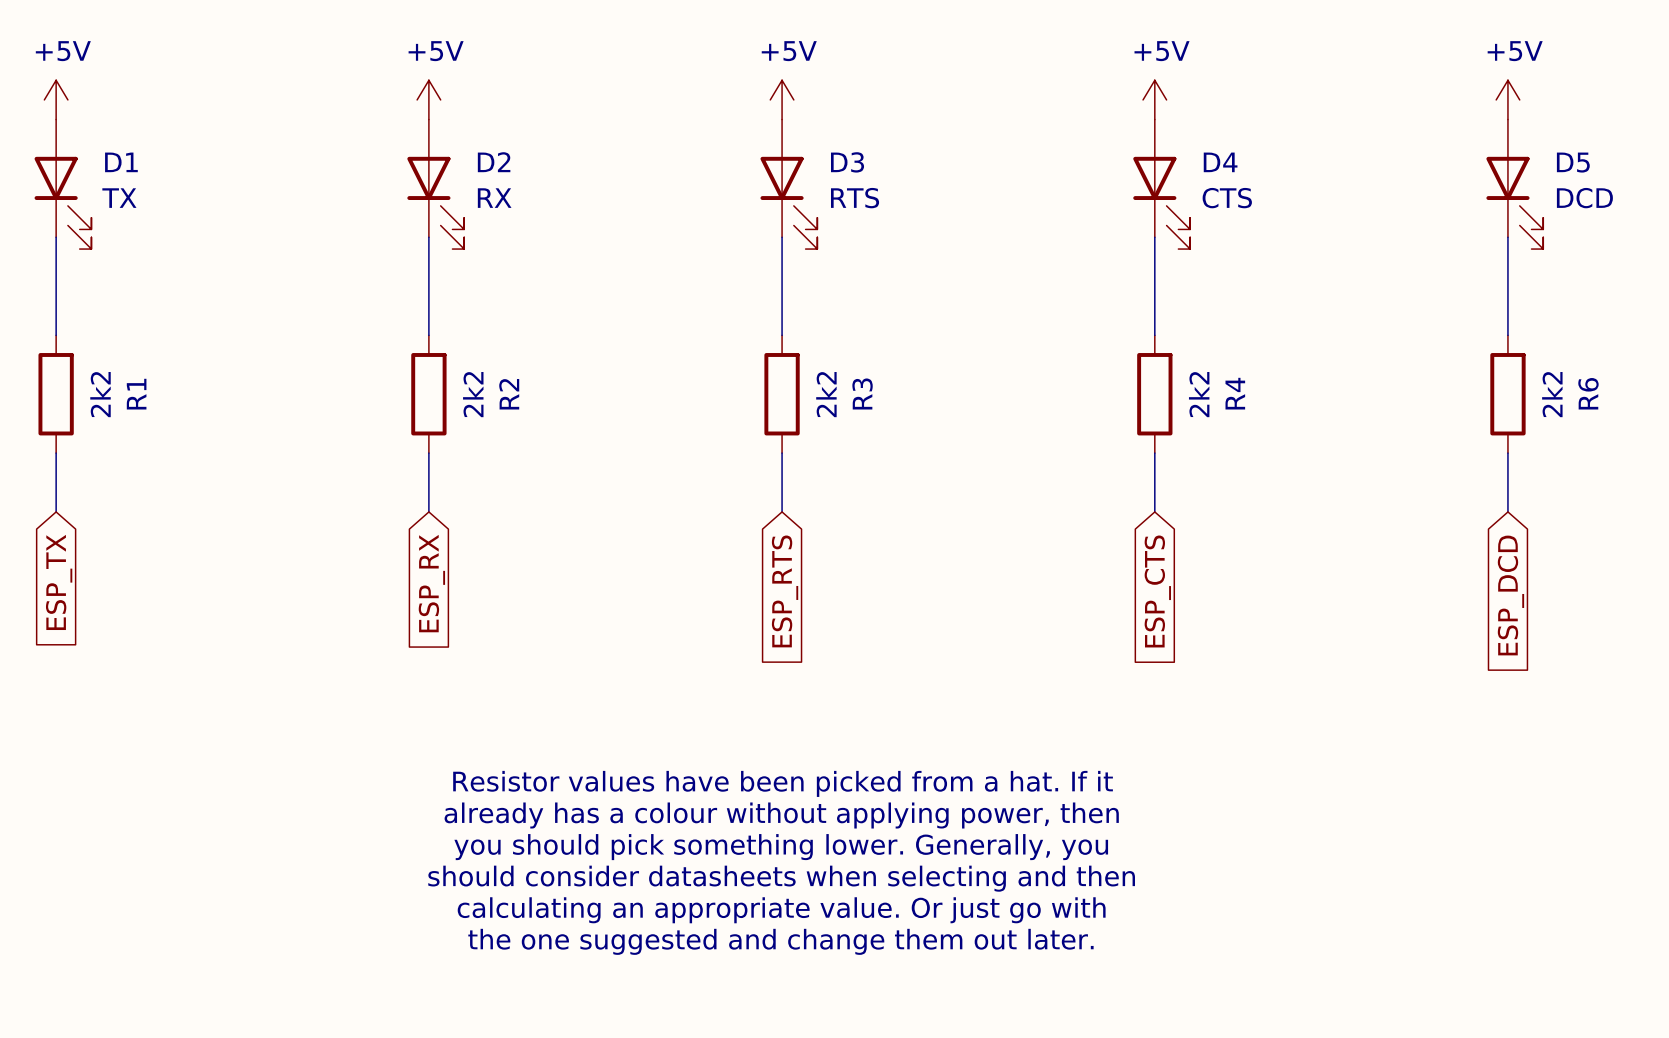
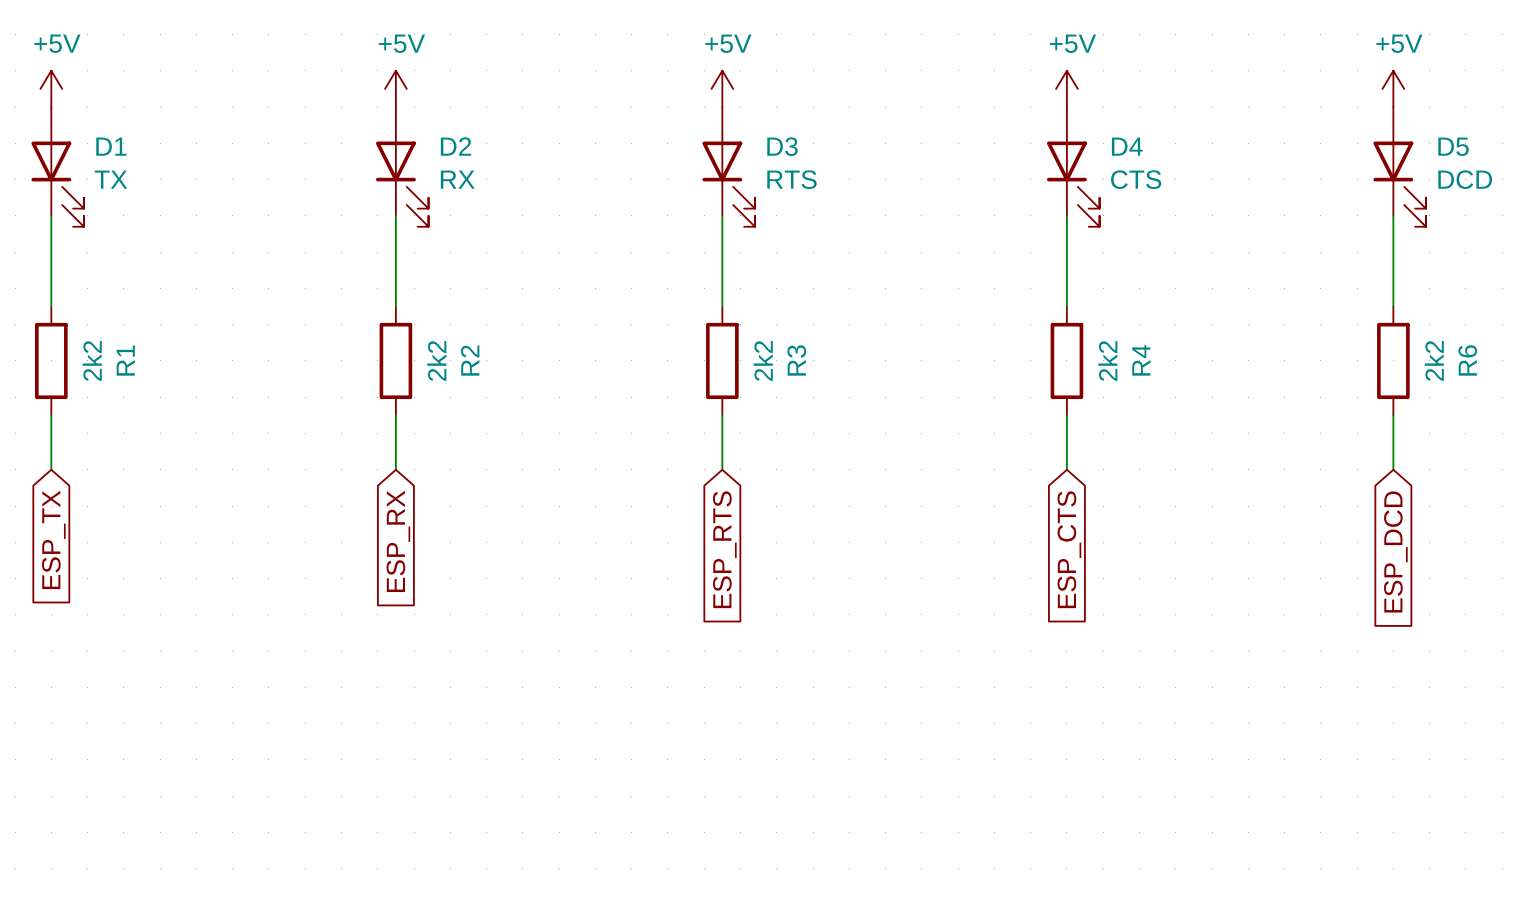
text: Resistor values have been picked from a hat. If it (783, 783) -> none
text: already has a colour without applying power, then (781, 815) -> none
text: you should pick something lower. Generally, you (781, 847) -> none
text: should consider datasheets when selecting and then (781, 878) -> none
text: calculating an appropriate value. Or just go with (781, 910) -> none
text: the one suggested and change them out later. (780, 941) -> none

